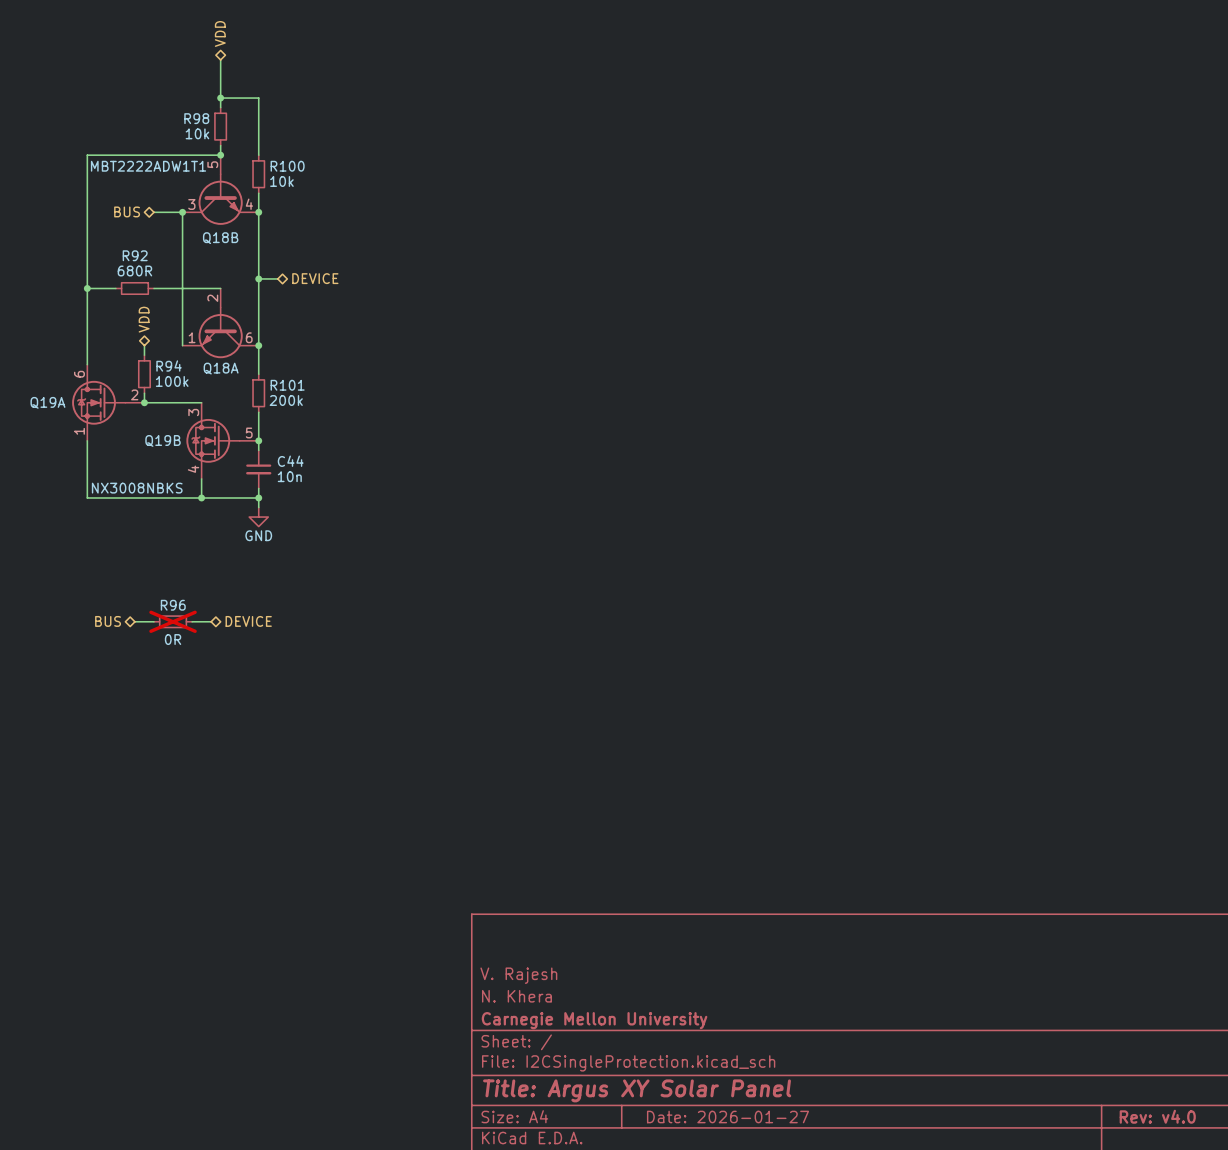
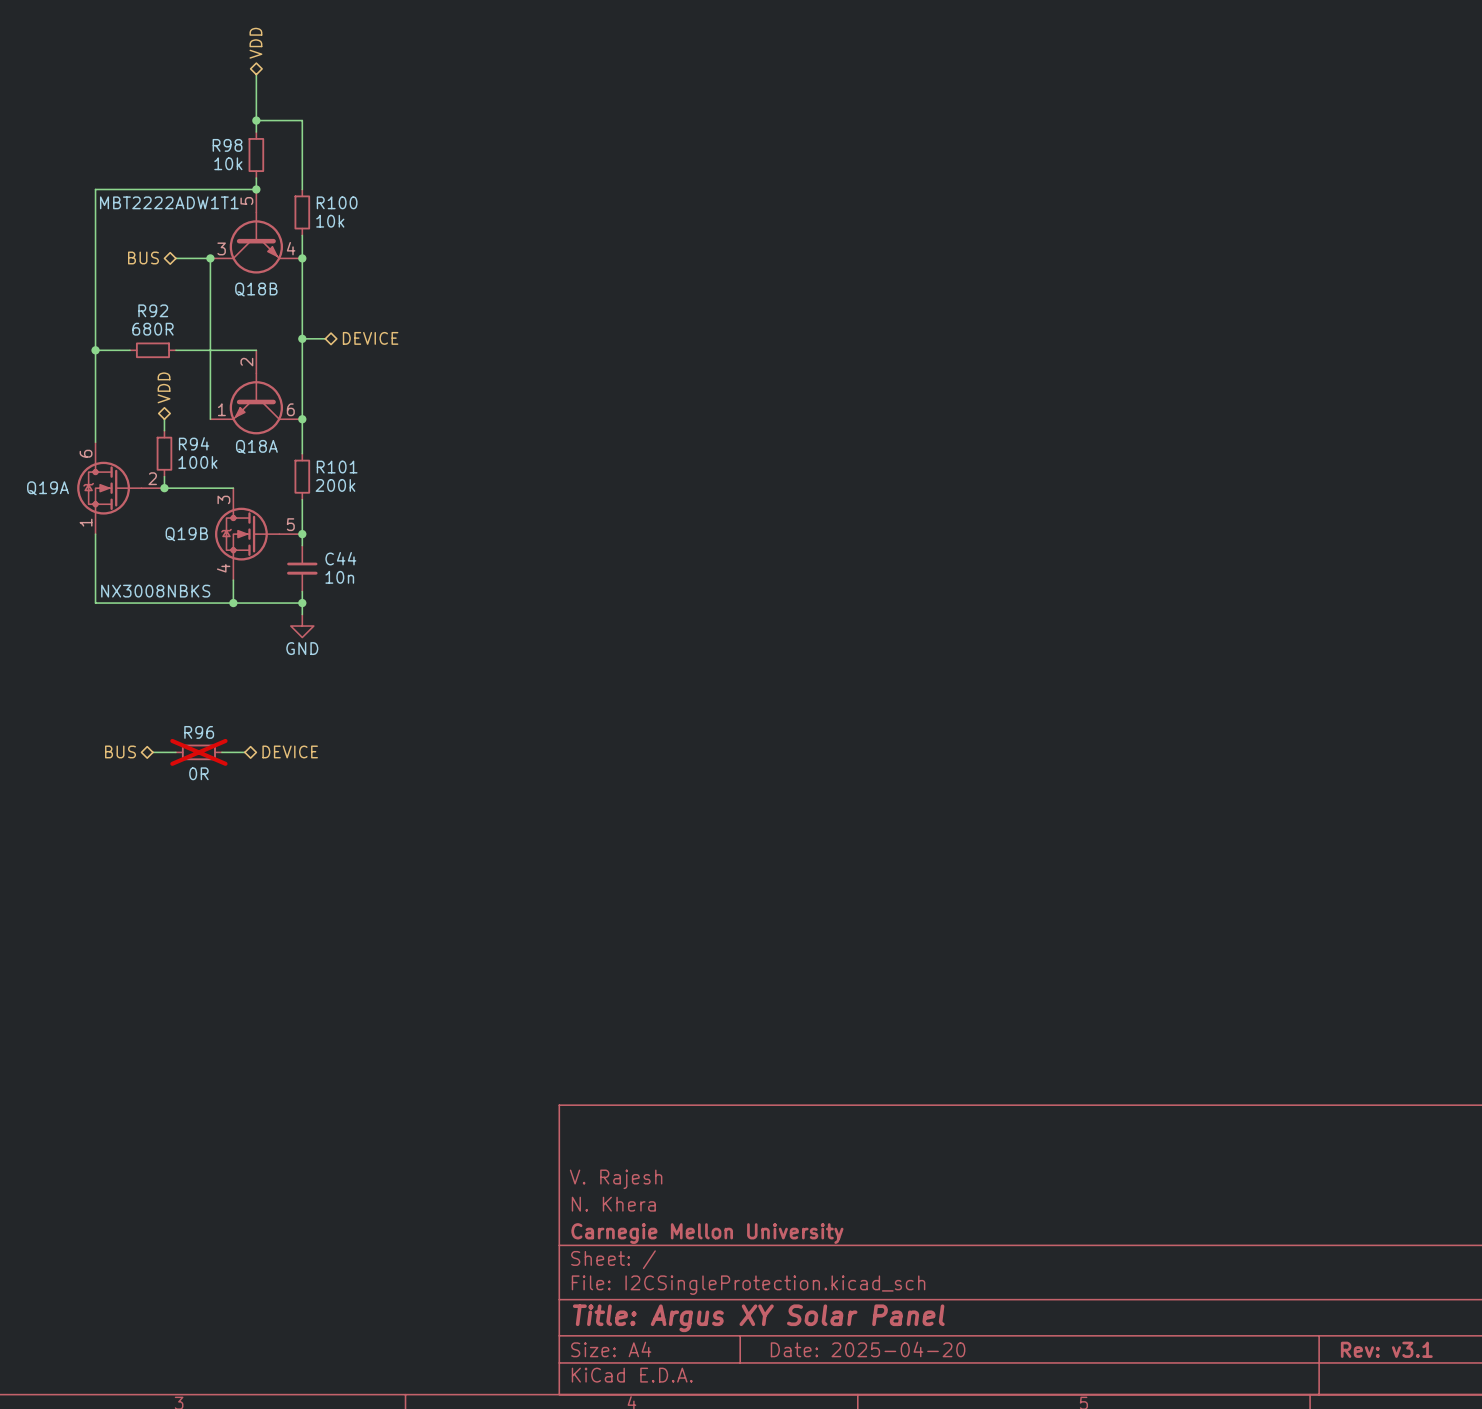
title block: Rev: v4.0 (1157, 1116) -> Rev: v3.1 (1386, 1349)
title block: Date: 2026-01-27 (727, 1117) -> Date: 2025-04-20 (868, 1349)

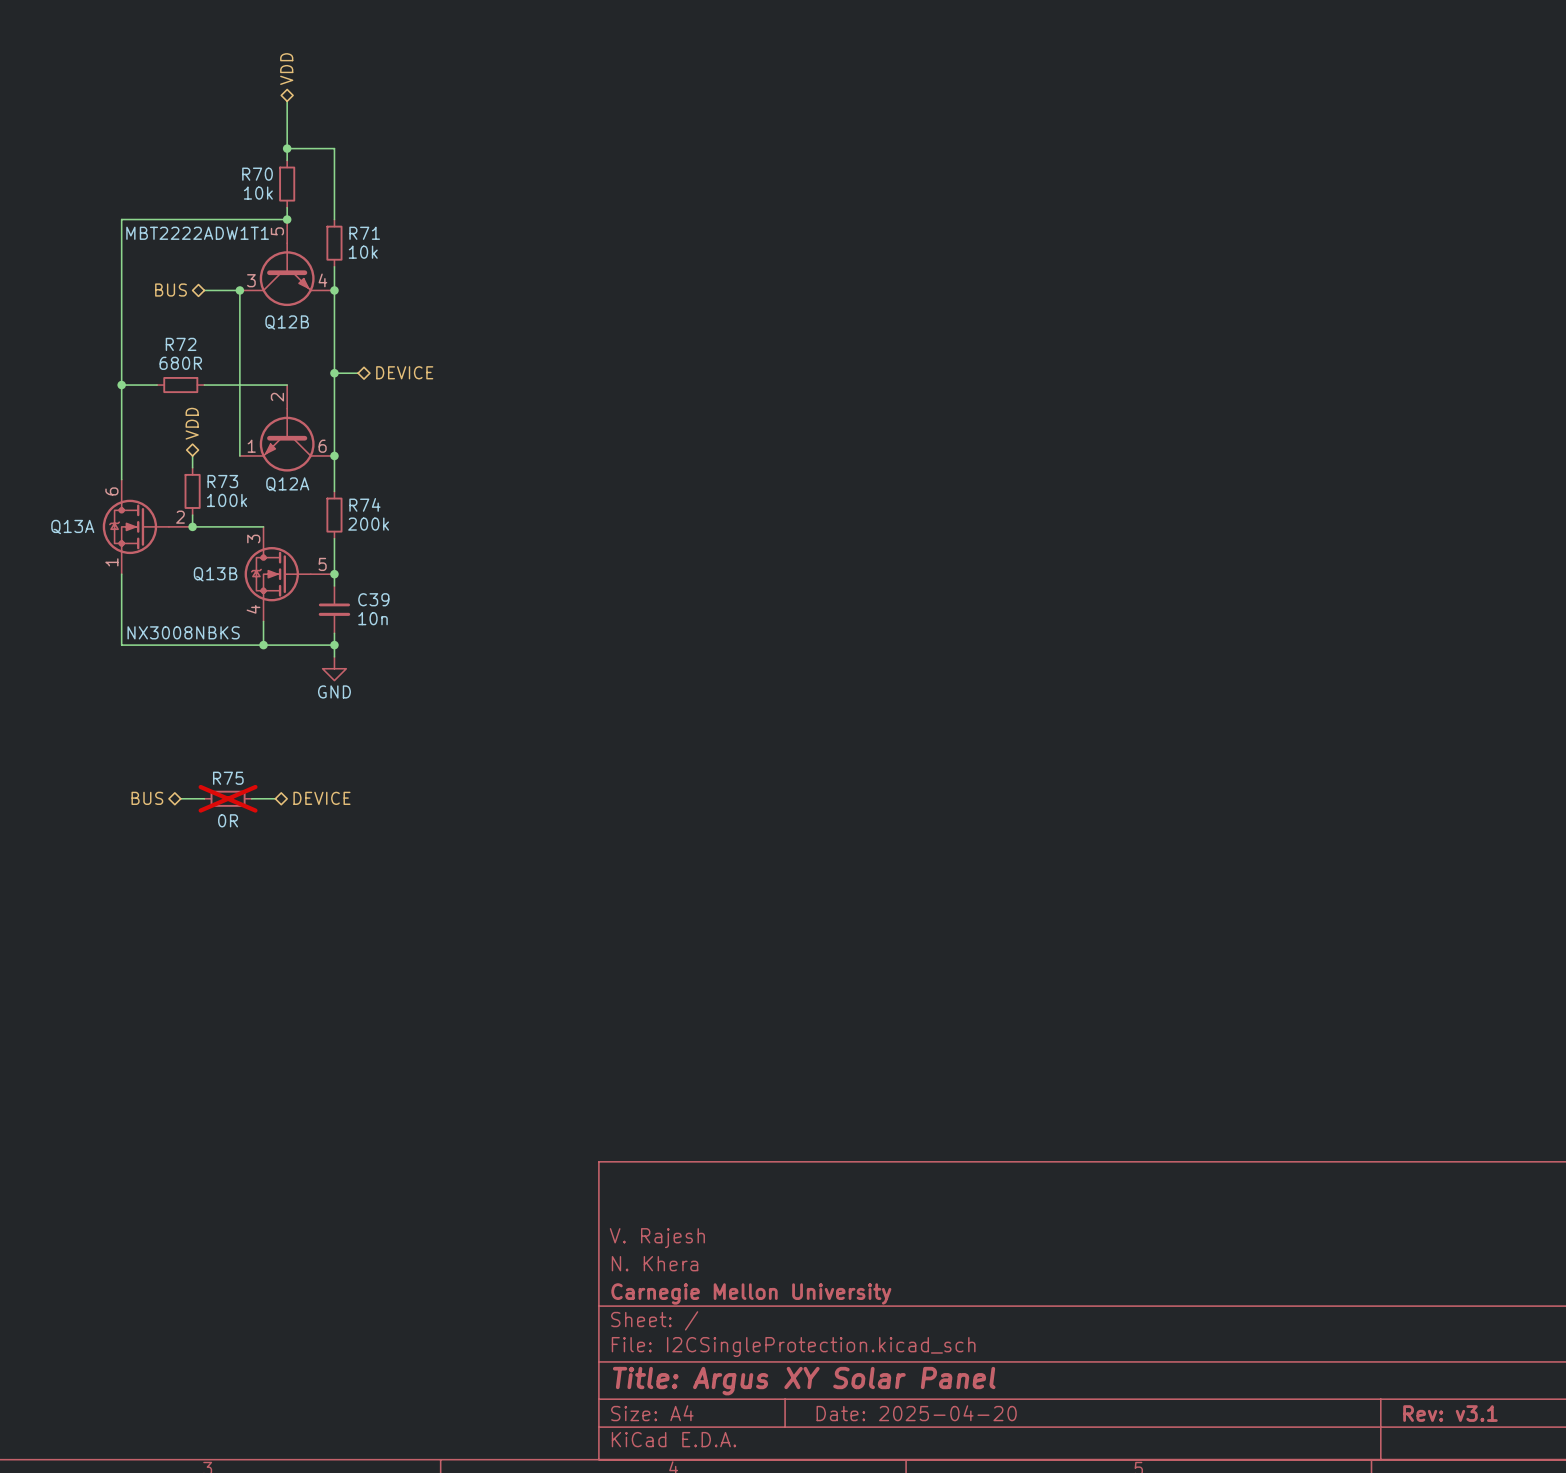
R98 name: R98 (227, 145) -> R70 (257, 174)
R100 name: R100 (337, 202) -> R71 (364, 233)
Q18B name: Q18B (256, 289) -> Q12B (287, 322)
R92 name: R92 (153, 310) -> R72 (181, 344)
R94 name: R94 (194, 443) -> R73 (222, 481)
Q18A name: Q18A (256, 446) -> Q12A (287, 484)
R101 name: R101 (337, 467) -> R74 (364, 504)
Q19A name: Q19A (48, 488) -> Q13A (72, 527)
Q19B name: Q19B (186, 534) -> Q13B (215, 574)
C44 name: C44 (340, 558) -> C39 (373, 599)
R96 name: R96 (199, 732) -> R75 (228, 778)

